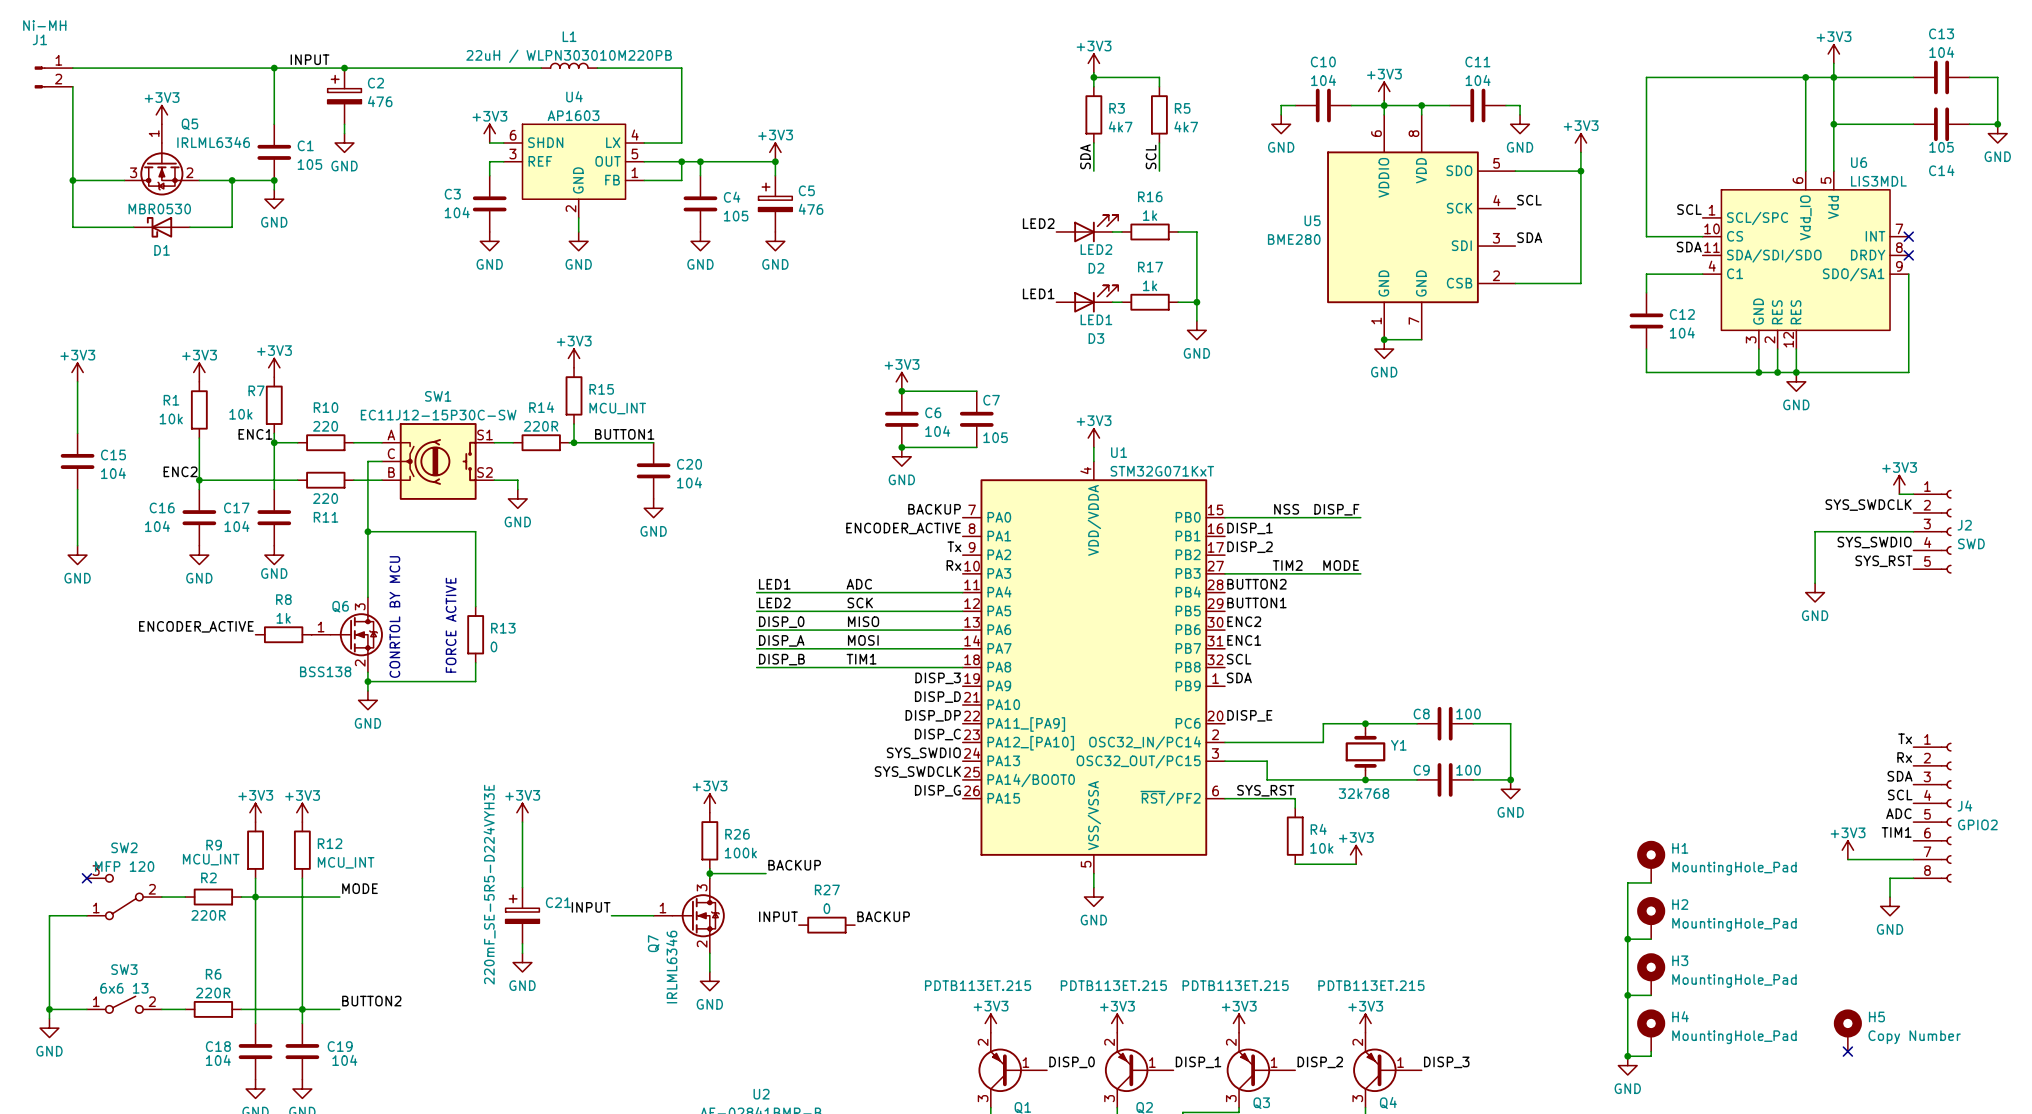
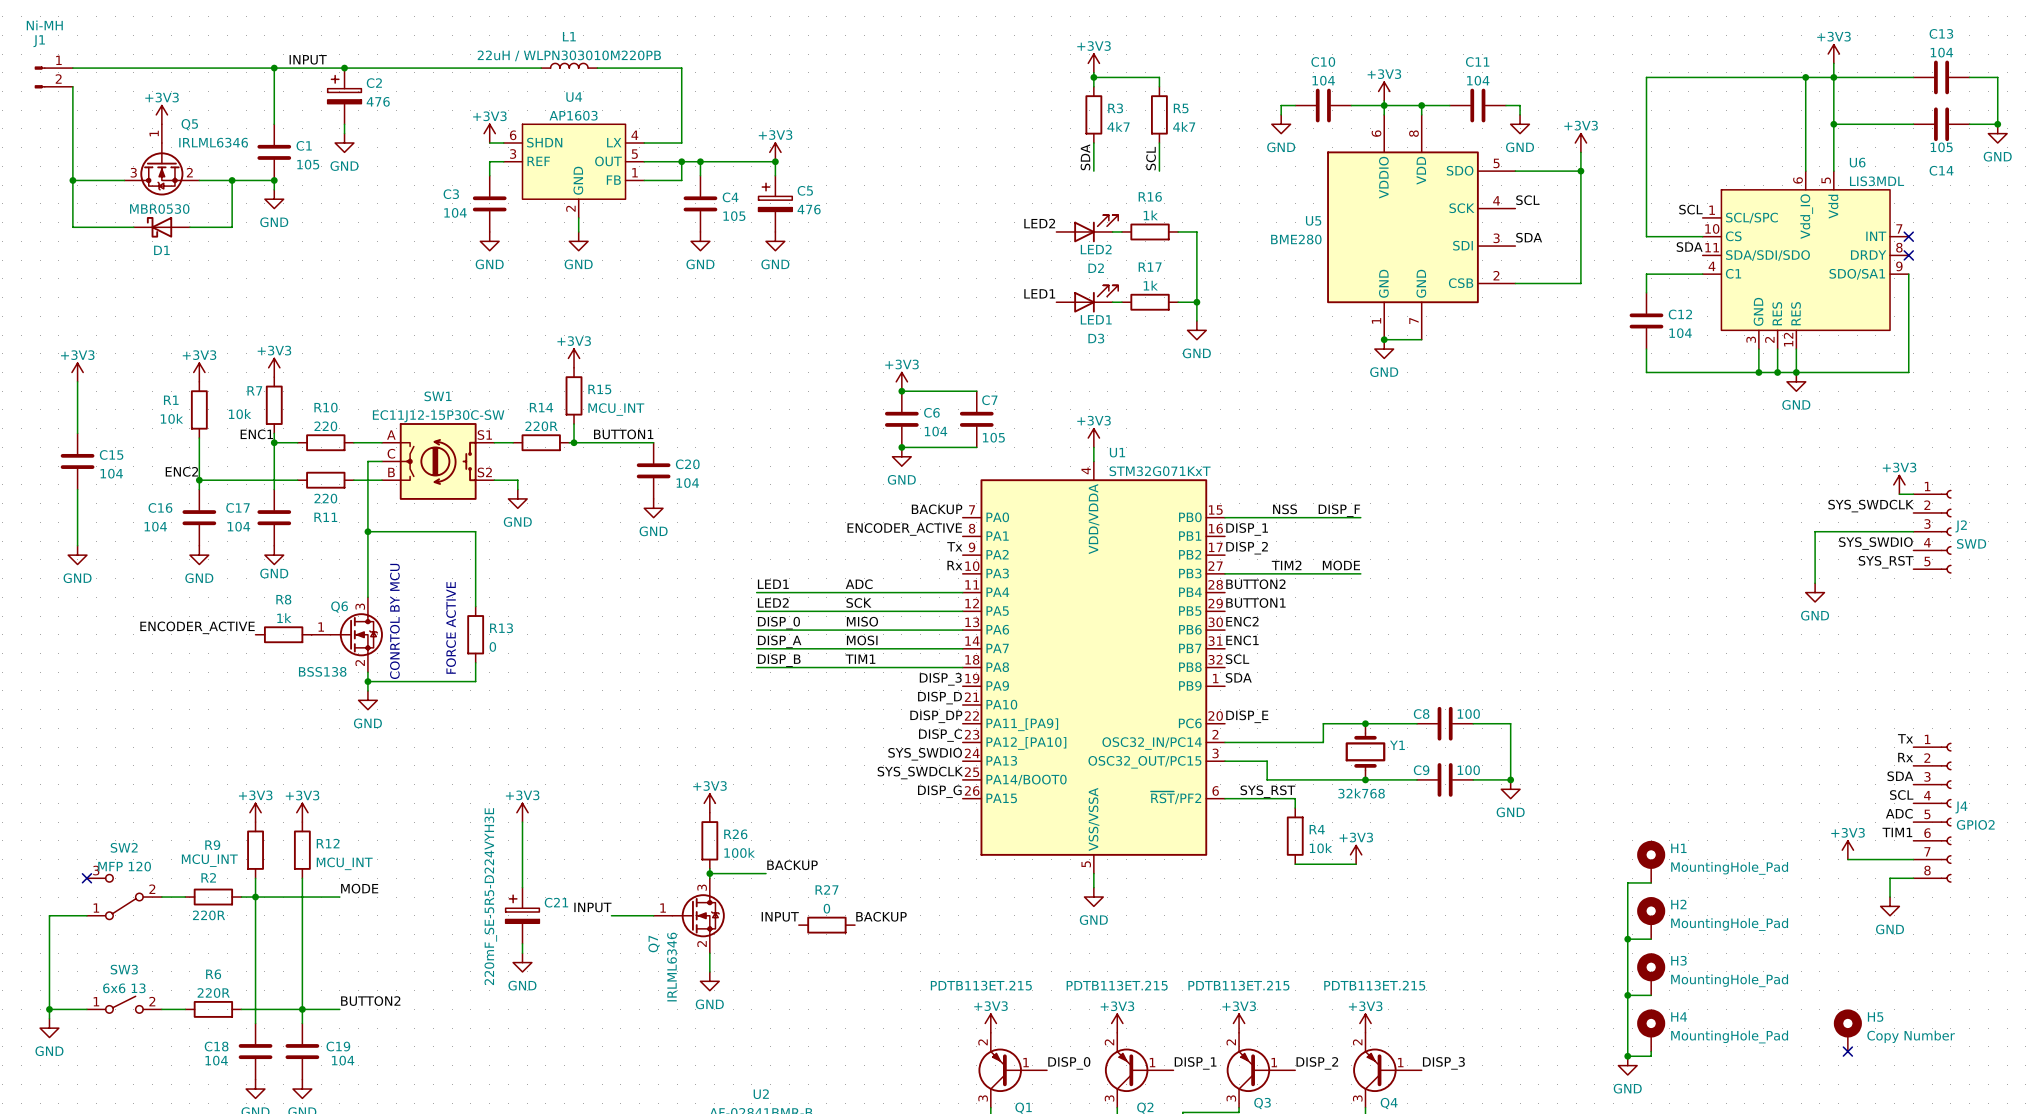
SW1 symbol: [381, 423, 495, 500] -> [381, 423, 495, 500]

